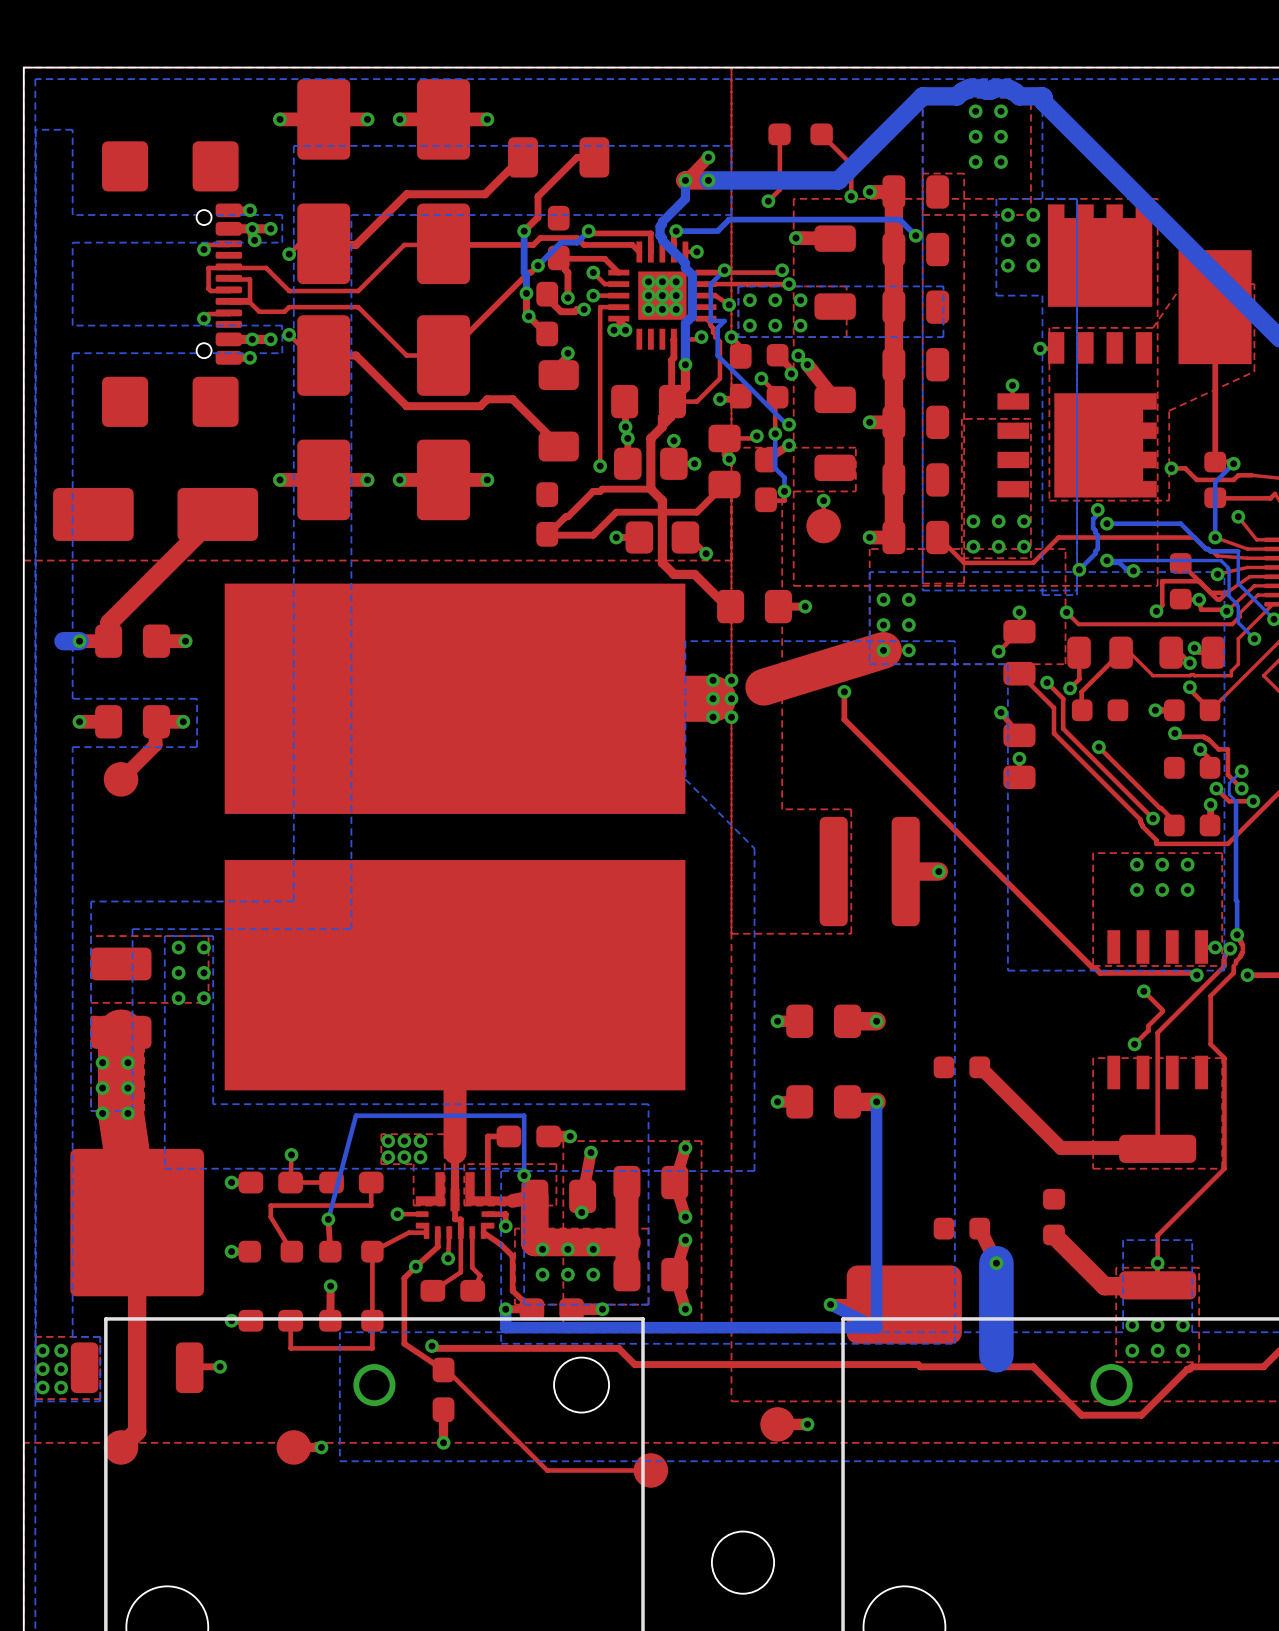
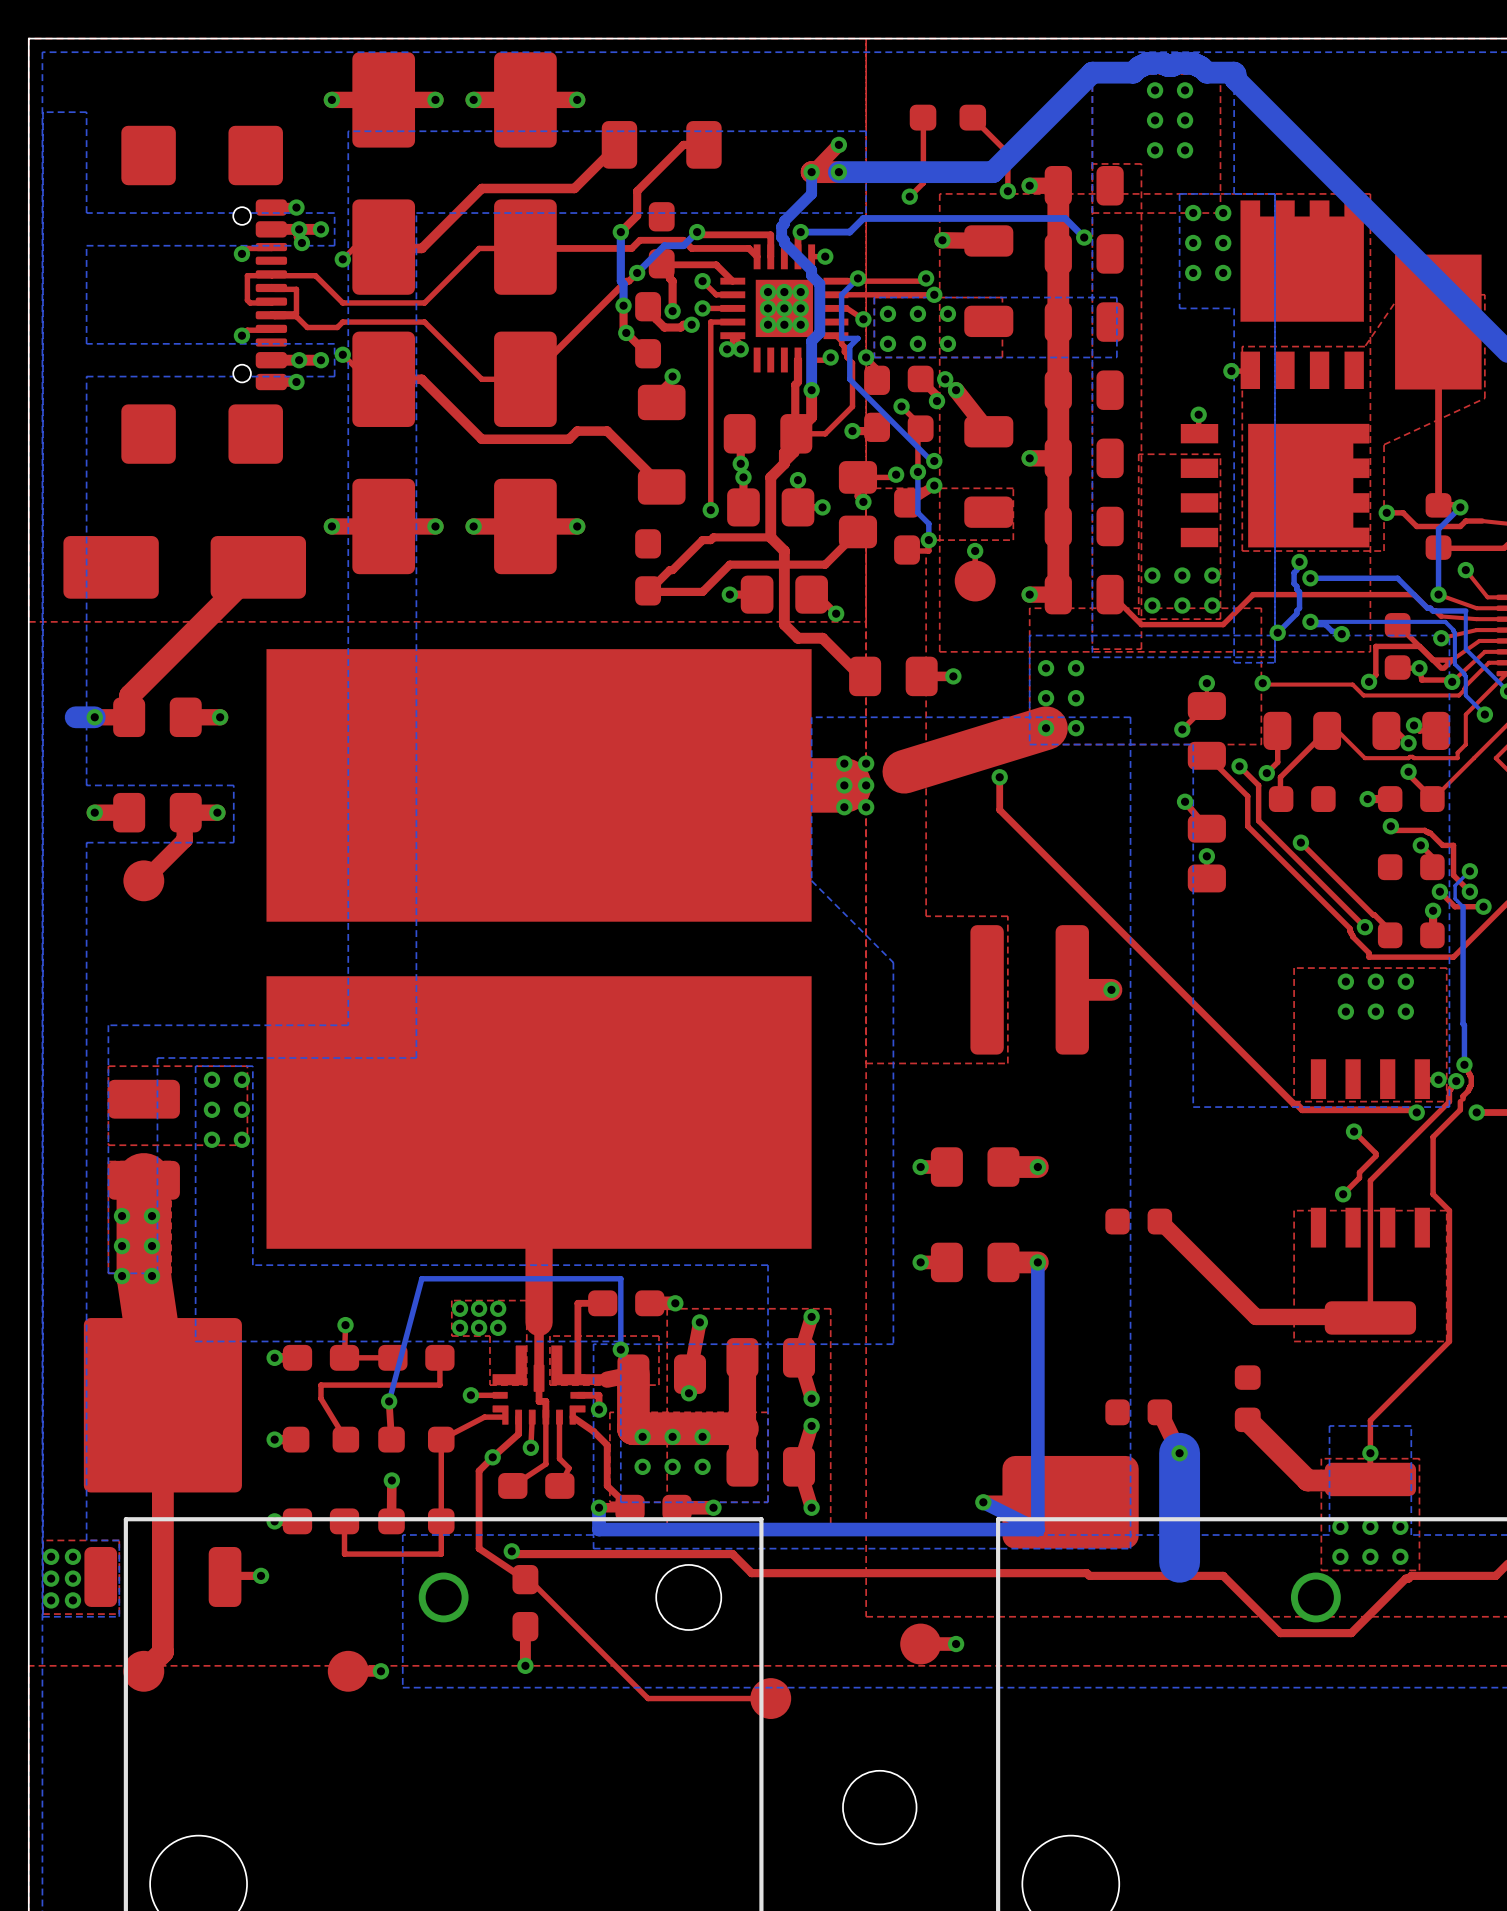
top track: (1066, 612) (1078, 624) (1232, 624) (1239, 614) -> none
top track: none -> (1264, 684) (1352, 684) (1363, 695) (1458, 695) (1465, 685)

